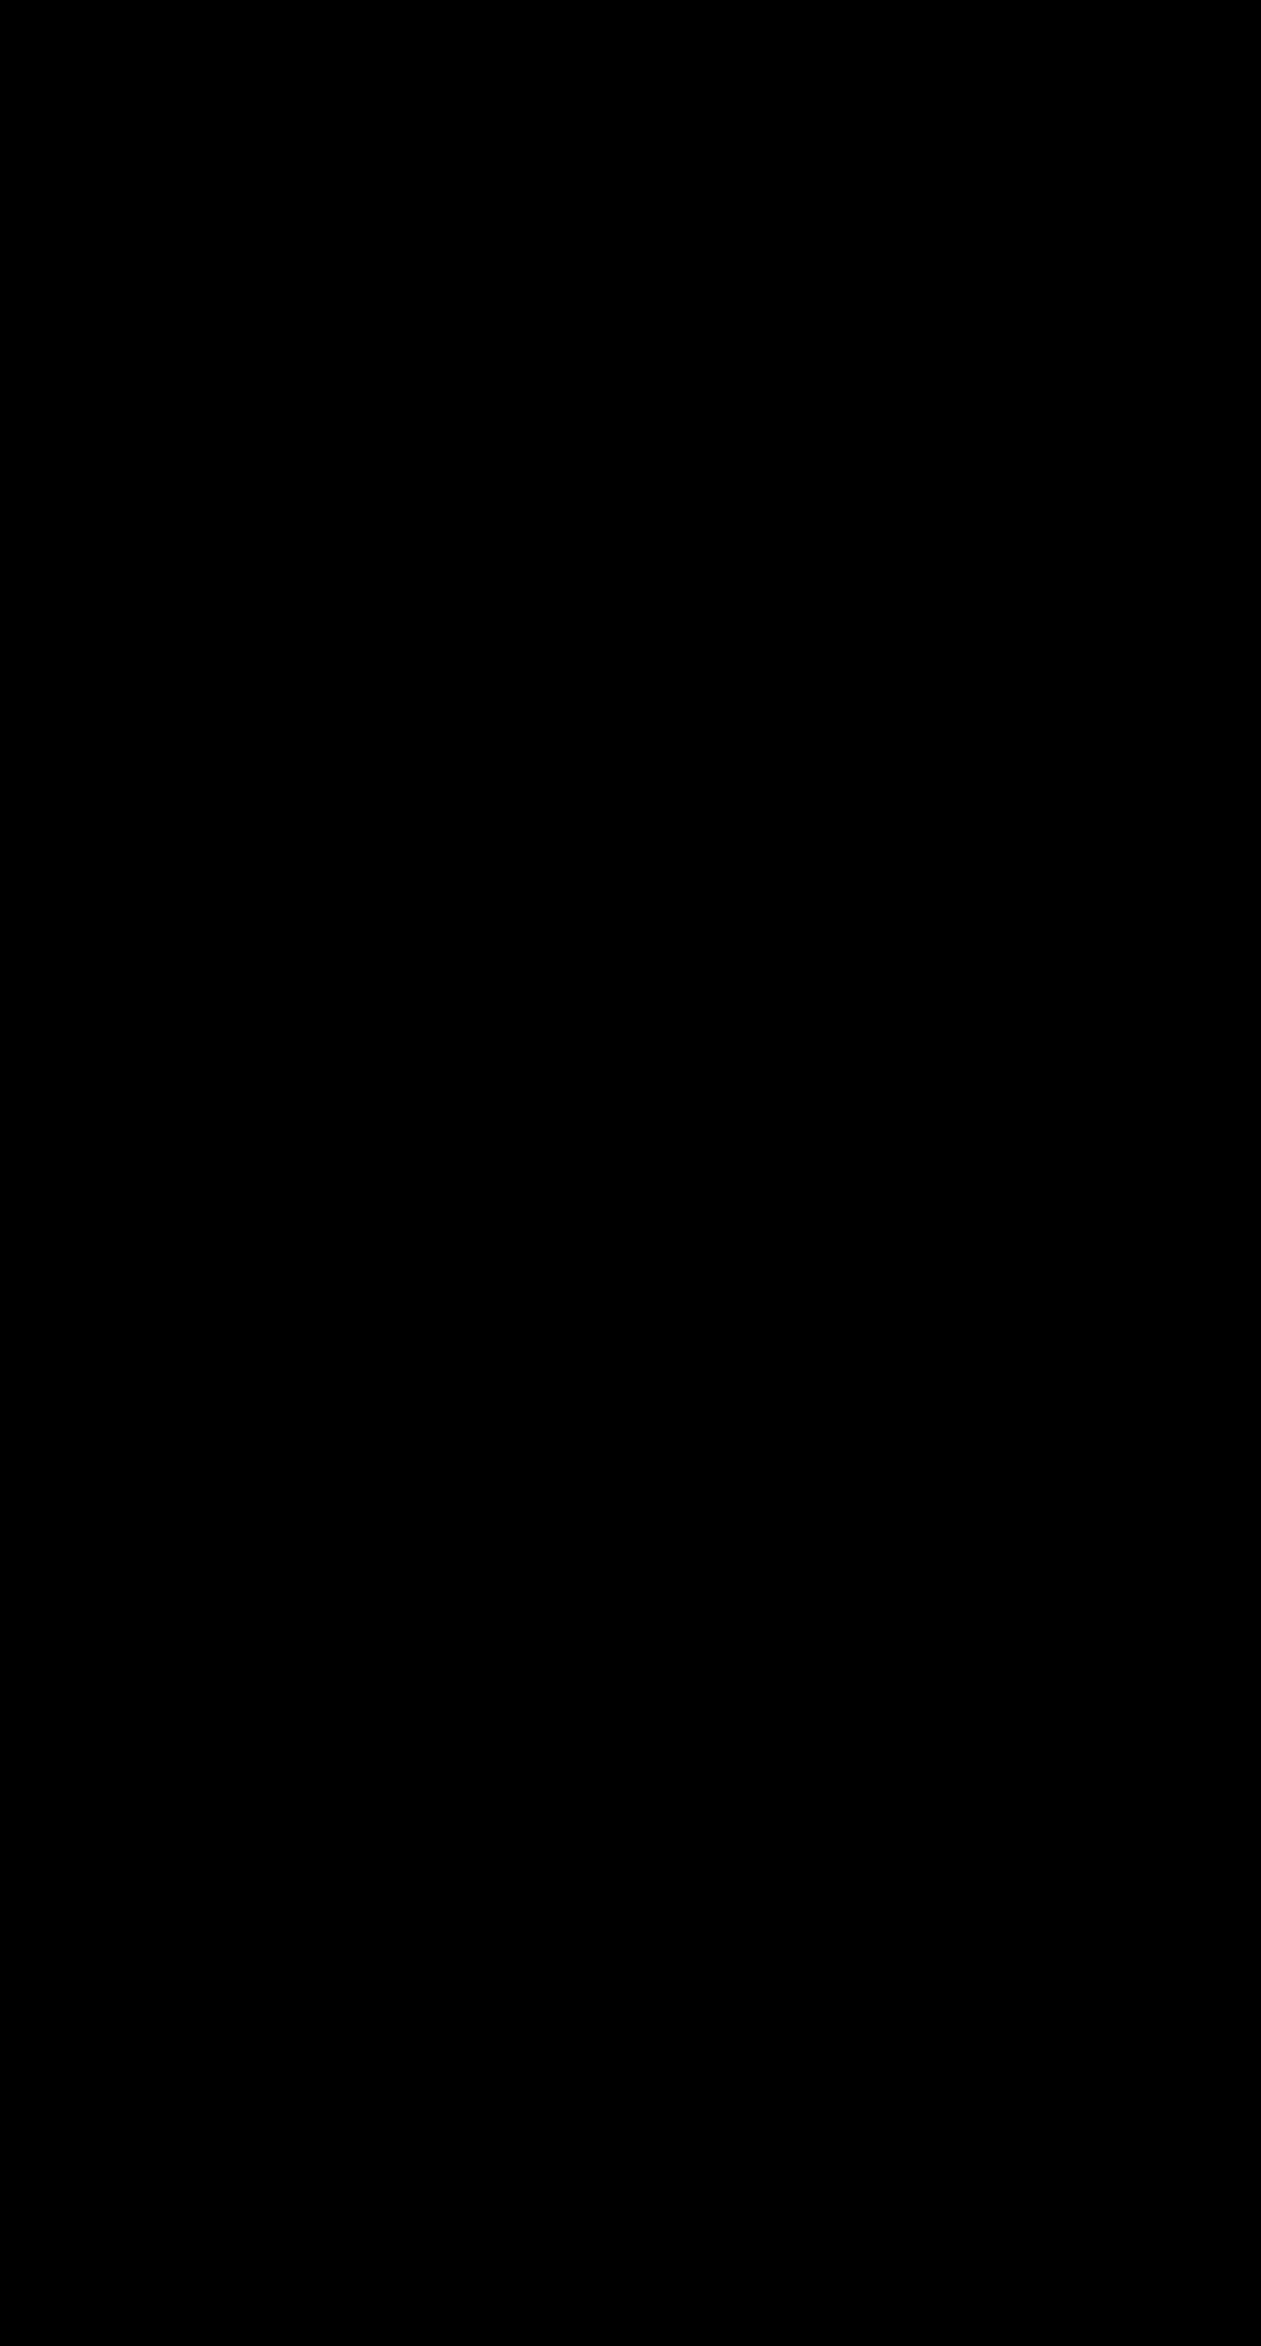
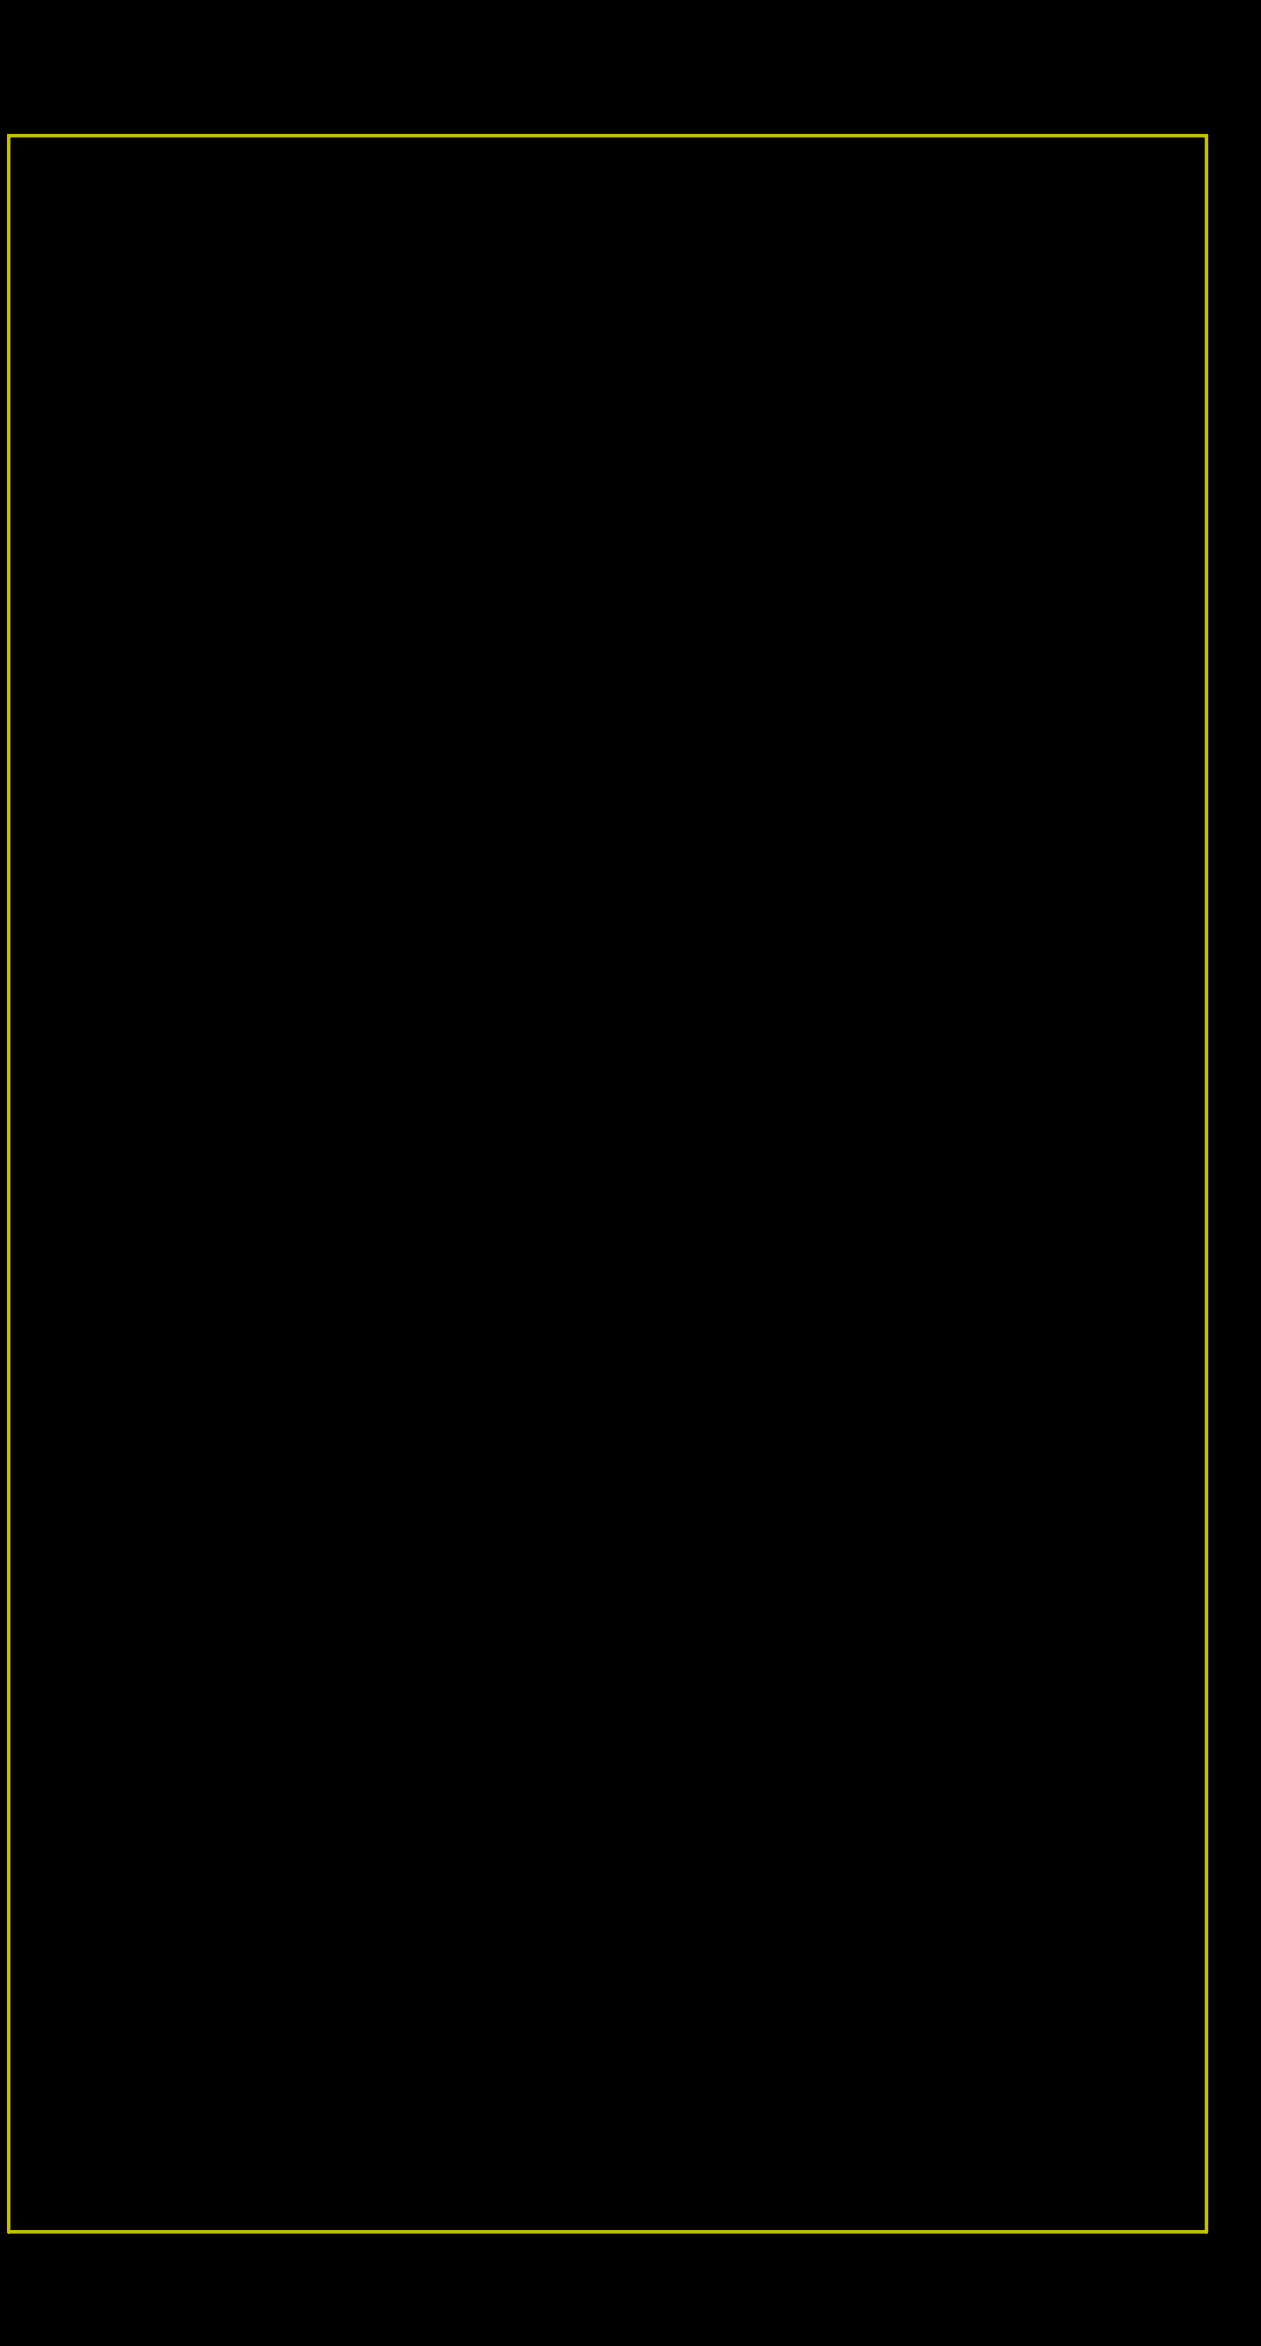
board edge: none -> (8, 135) (8, 2231) (1206, 2231) (1206, 135) (8, 135)

